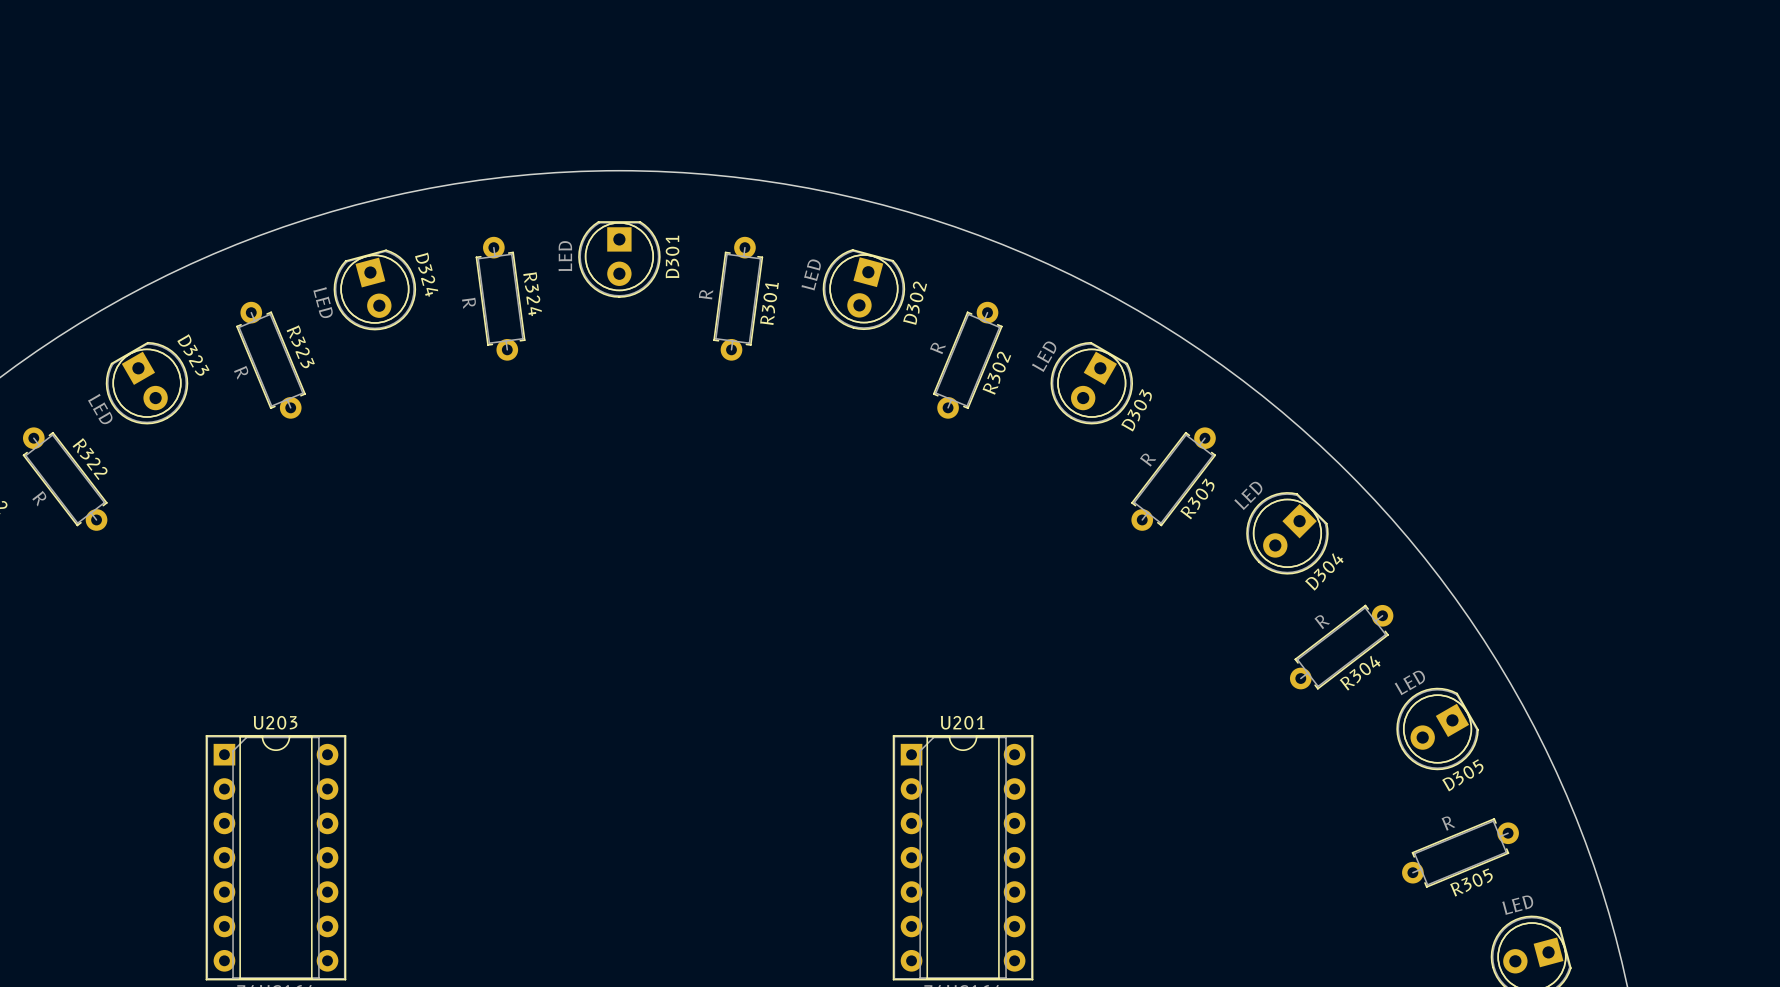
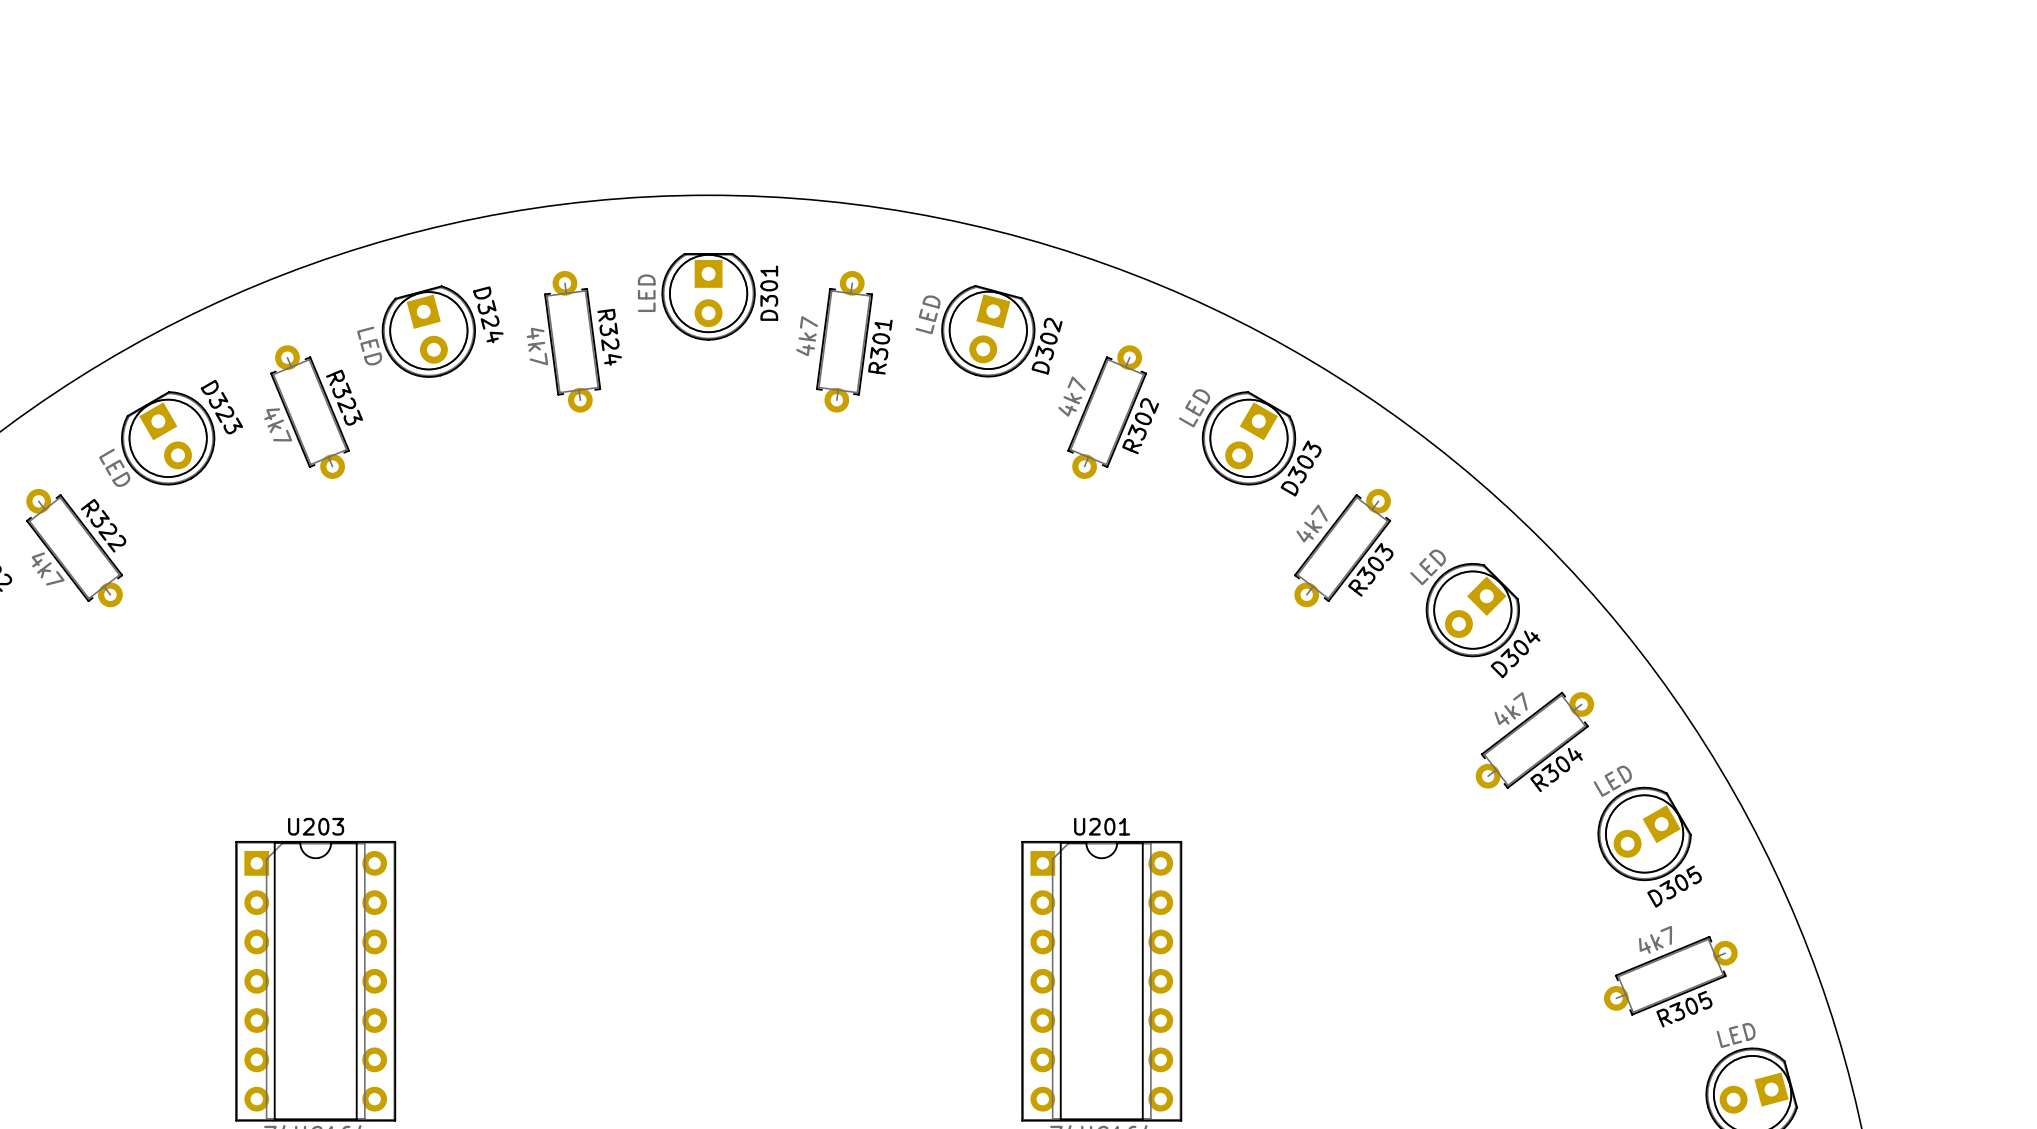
R301 value: R (706, 294) -> 4k7 (807, 336)
R324 value: R (468, 303) -> 4k7 (537, 346)
R302 value: R (937, 348) -> 4k7 (1071, 396)
R323 value: R (241, 372) -> 4k7 (278, 424)
R303 value: R (1148, 460) -> 4k7 (1312, 523)
R322 value: R (39, 498) -> 4k7 (48, 568)
R304 value: R (1322, 622) -> 4k7 (1511, 708)
R305 value: R (1448, 823) -> 4k7 (1655, 939)

